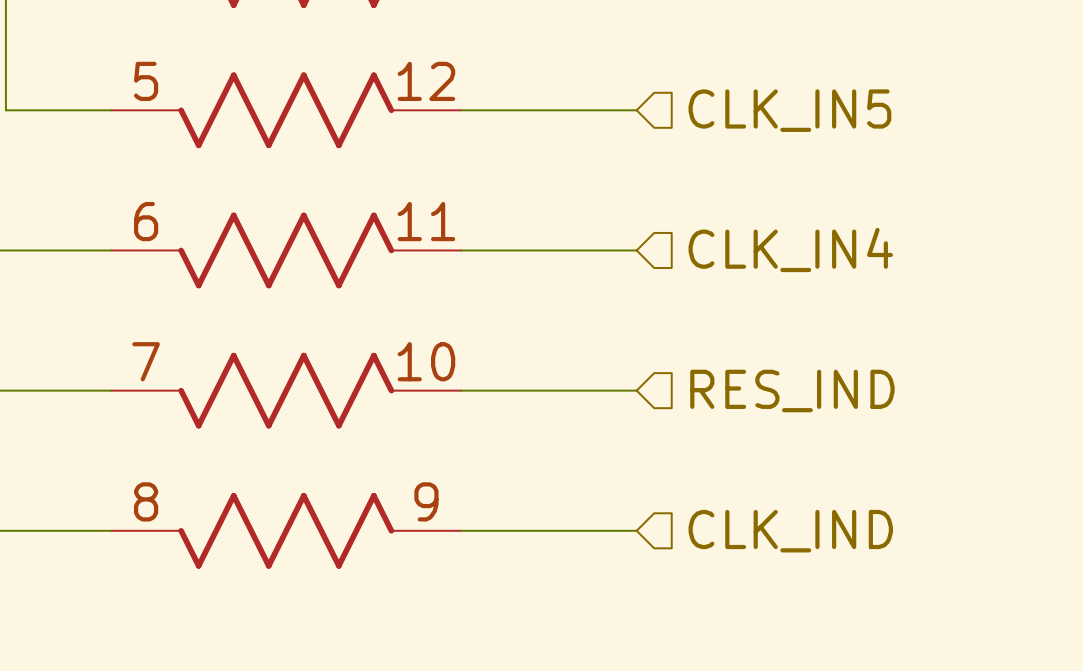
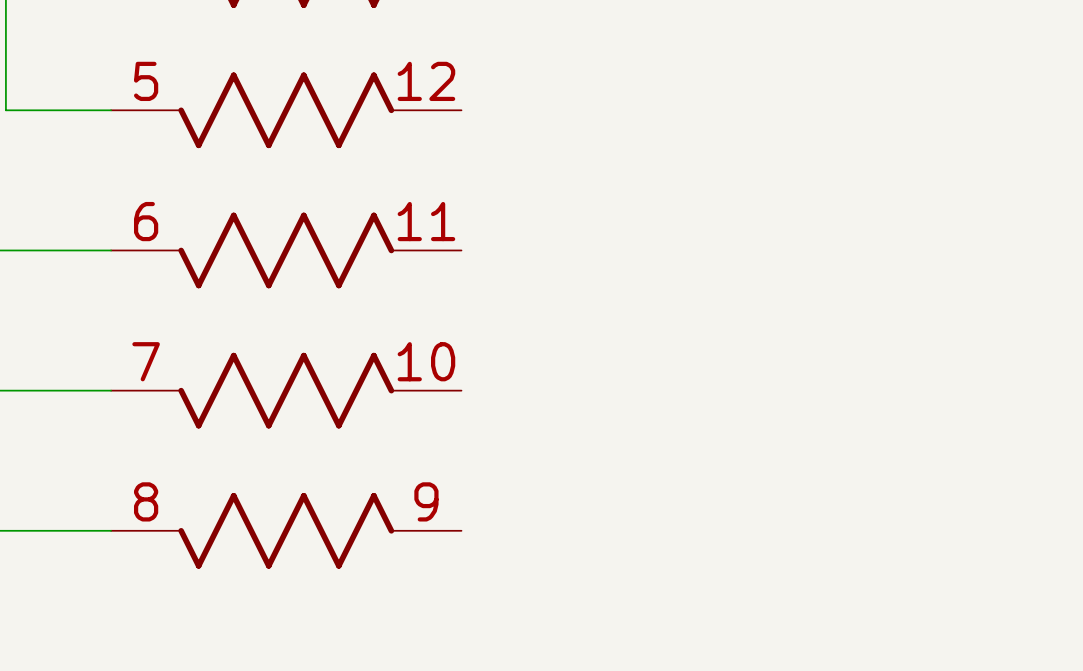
wire: (461, 110) (636, 110) -> none
hierarchical label: CLK_IN5 (789, 110) -> none
hierarchical label: CLK_IN4 (790, 249) -> none
wire: (461, 250) (636, 250) -> none
wire: (461, 390) (636, 390) -> none
hierarchical label: RES_IND (792, 391) -> none
wire: (461, 530) (636, 530) -> none
hierarchical label: CLK_IND (790, 531) -> none

